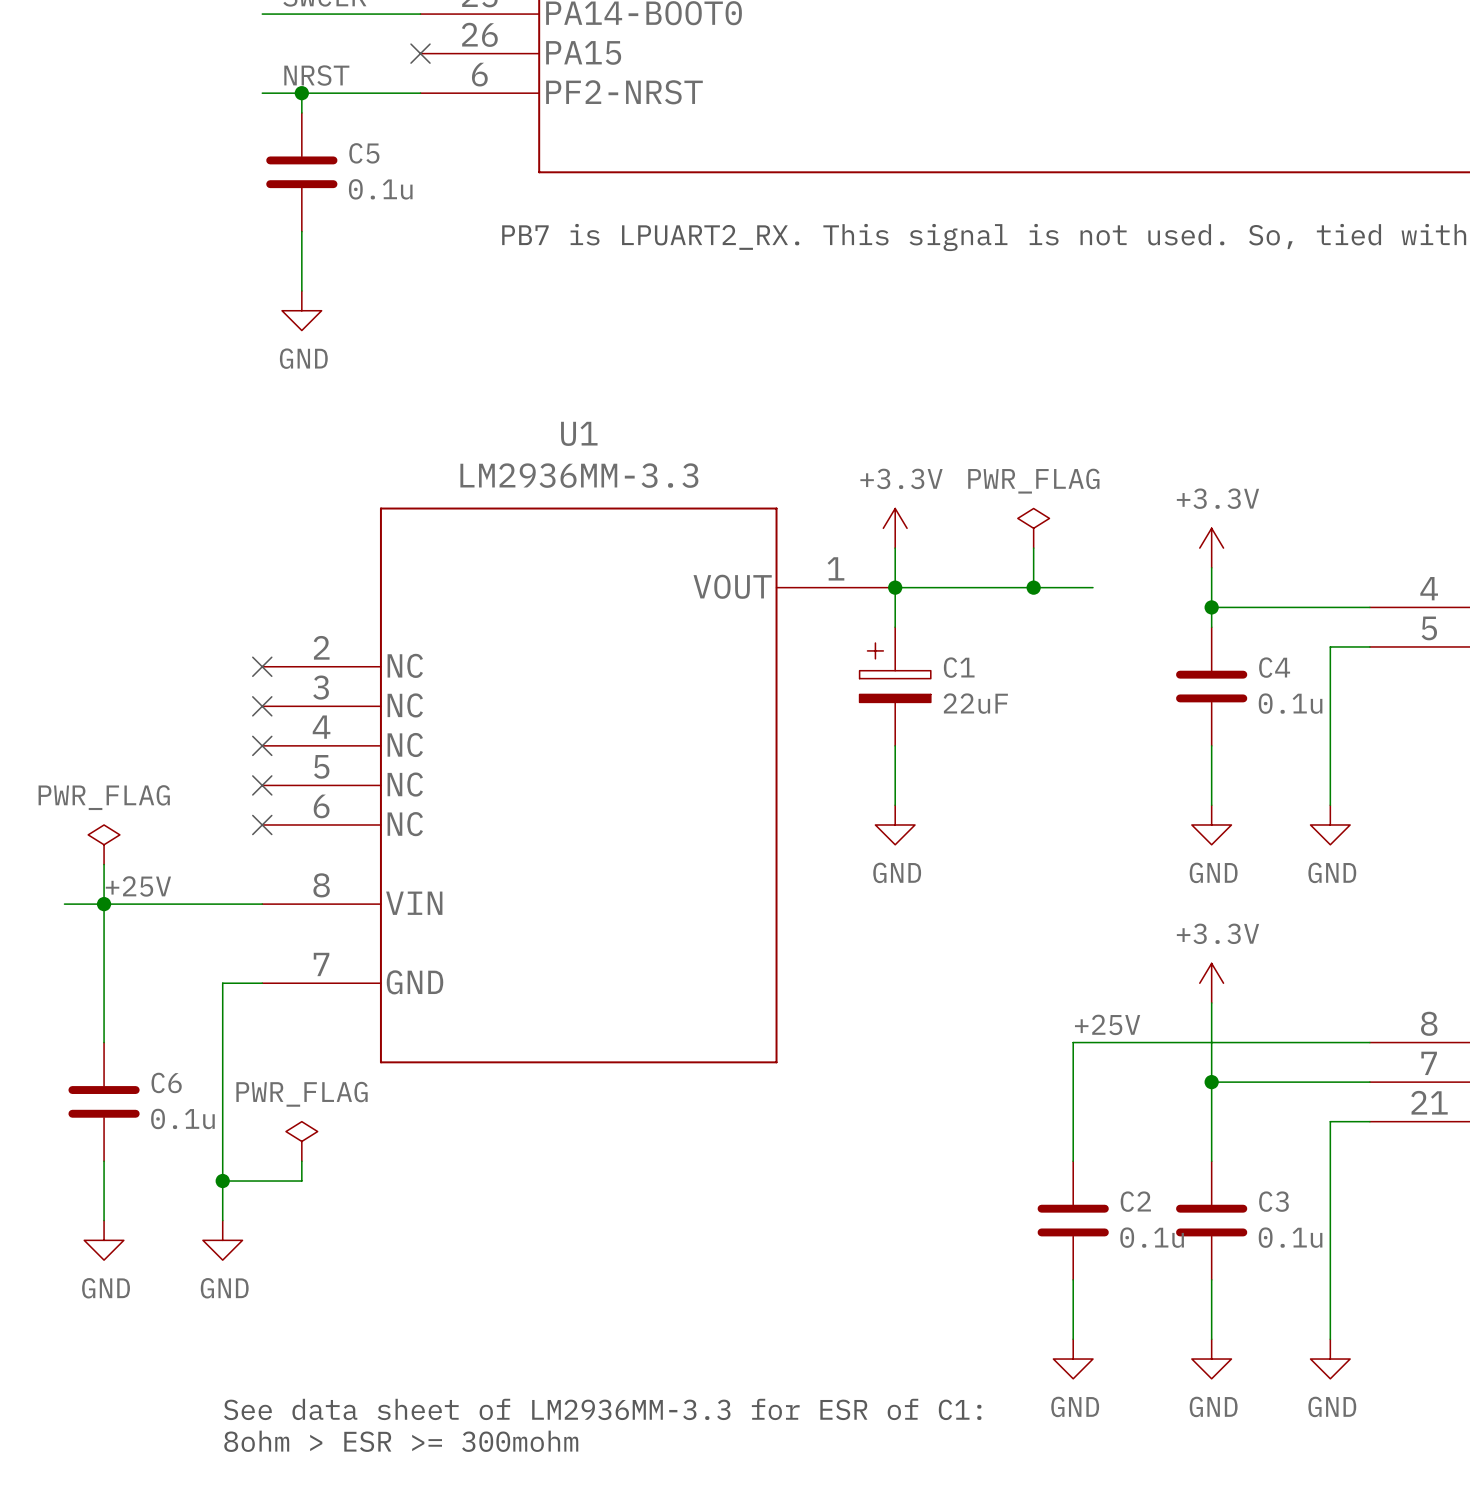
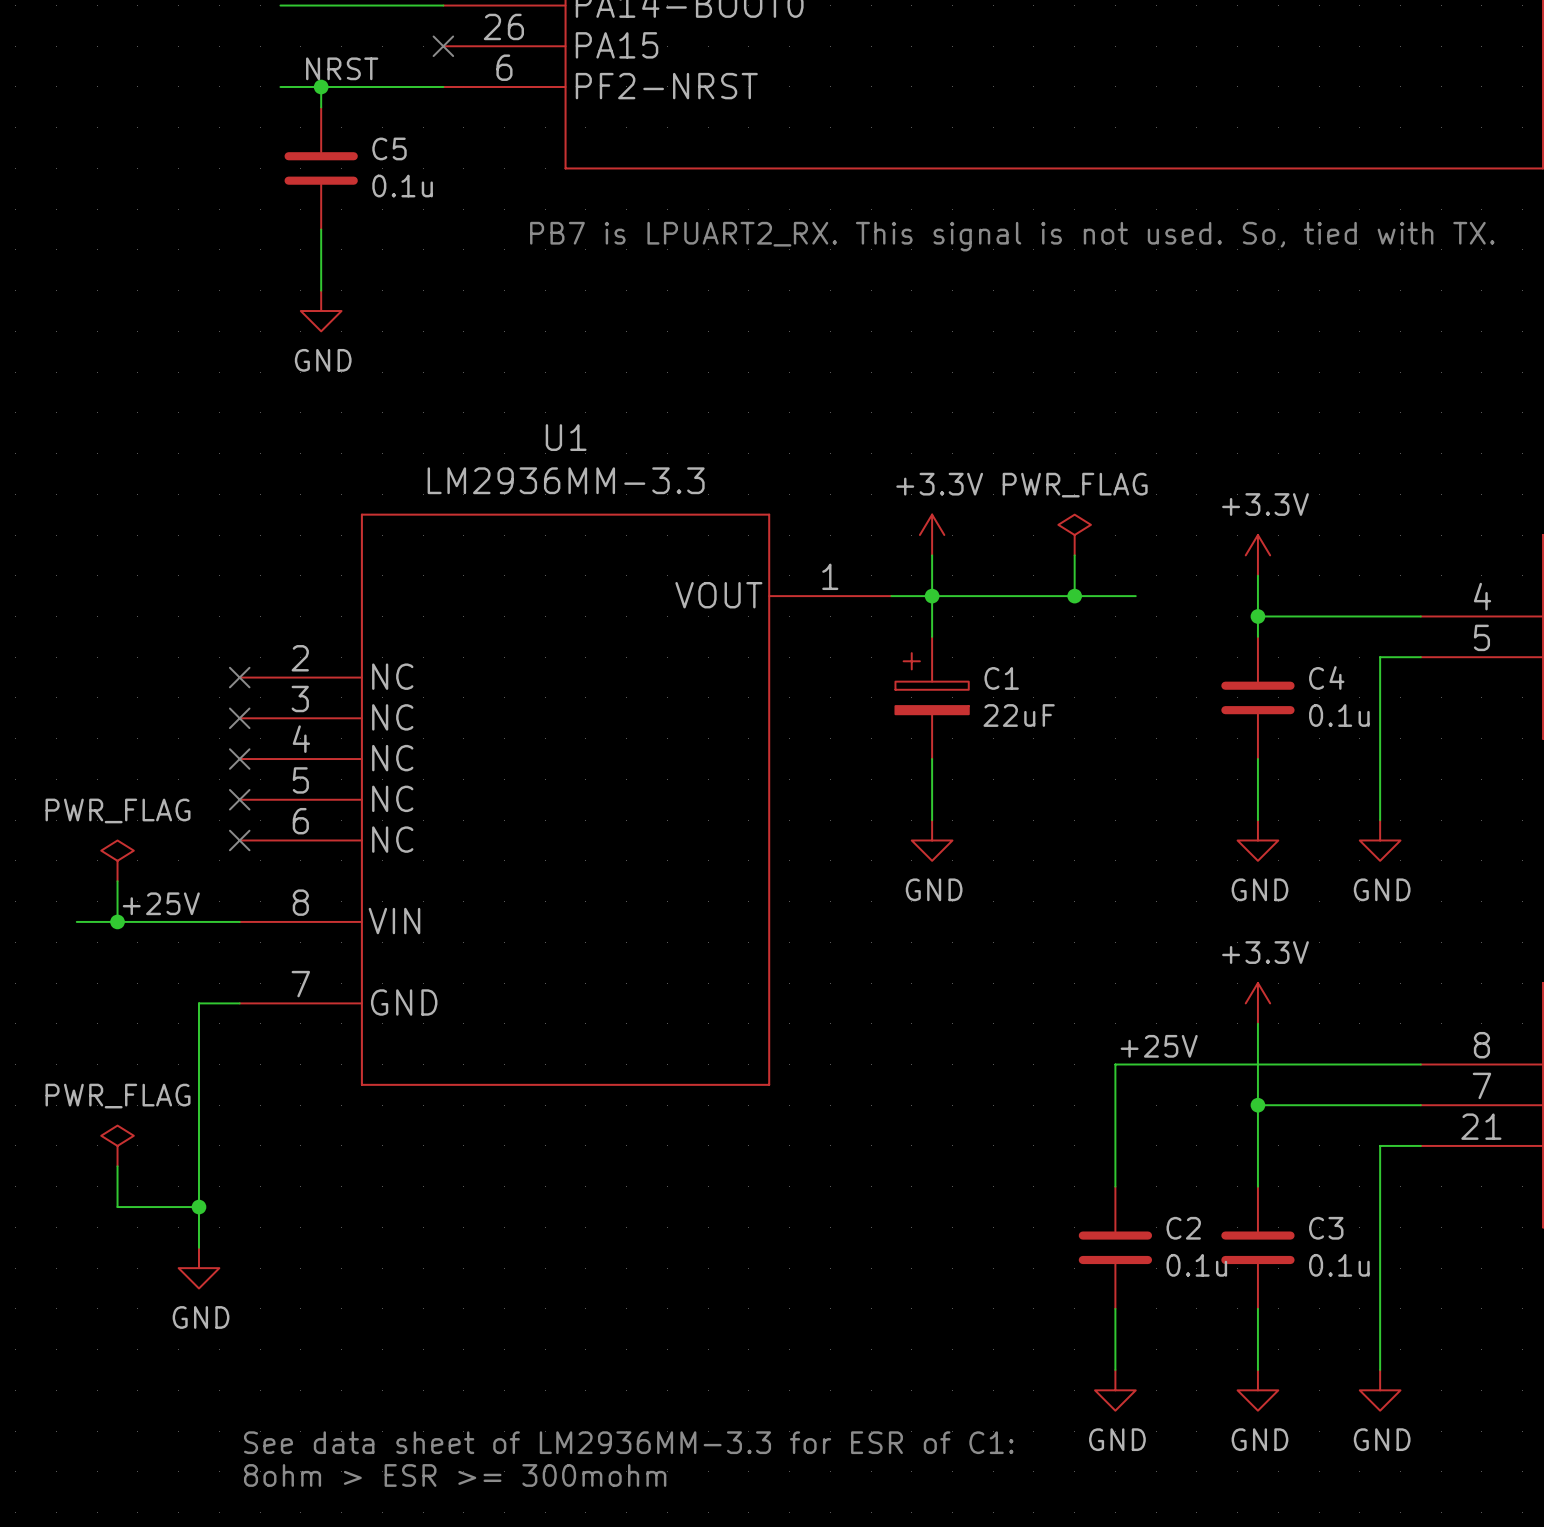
no-connect mark: none -> (239, 677)
no-connect mark: (262, 666) -> none
no-connect mark: none -> (239, 718)
no-connect mark: (262, 706) -> none
no-connect mark: none -> (239, 759)
no-connect mark: (262, 745) -> none
no-connect mark: none -> (239, 799)
no-connect mark: (262, 785) -> none
U1 position: (578, 785) -> (565, 799)
no-connect mark: none -> (239, 840)
no-connect mark: (262, 824) -> none
wire: (104, 904) (104, 1042) -> none
wire: (262, 983) (222, 983) (222, 1220) -> (239, 1003) (198, 1003) (198, 1247)
C6: 0.1u (104, 1101) -> none
power symbol position: PWR_FLAG (301, 1141) -> PWR_FLAG (117, 1145)
wire: (301, 1161) (301, 1181) (222, 1181) -> none
wire: (104, 1181) (104, 1220) -> (117, 1207) (198, 1207)
junction position: (222, 1181) -> (198, 1207)
power symbol: GND (104, 1240) -> none
power symbol: none -> GND (198, 1268)
power symbol: GND (222, 1240) -> none

